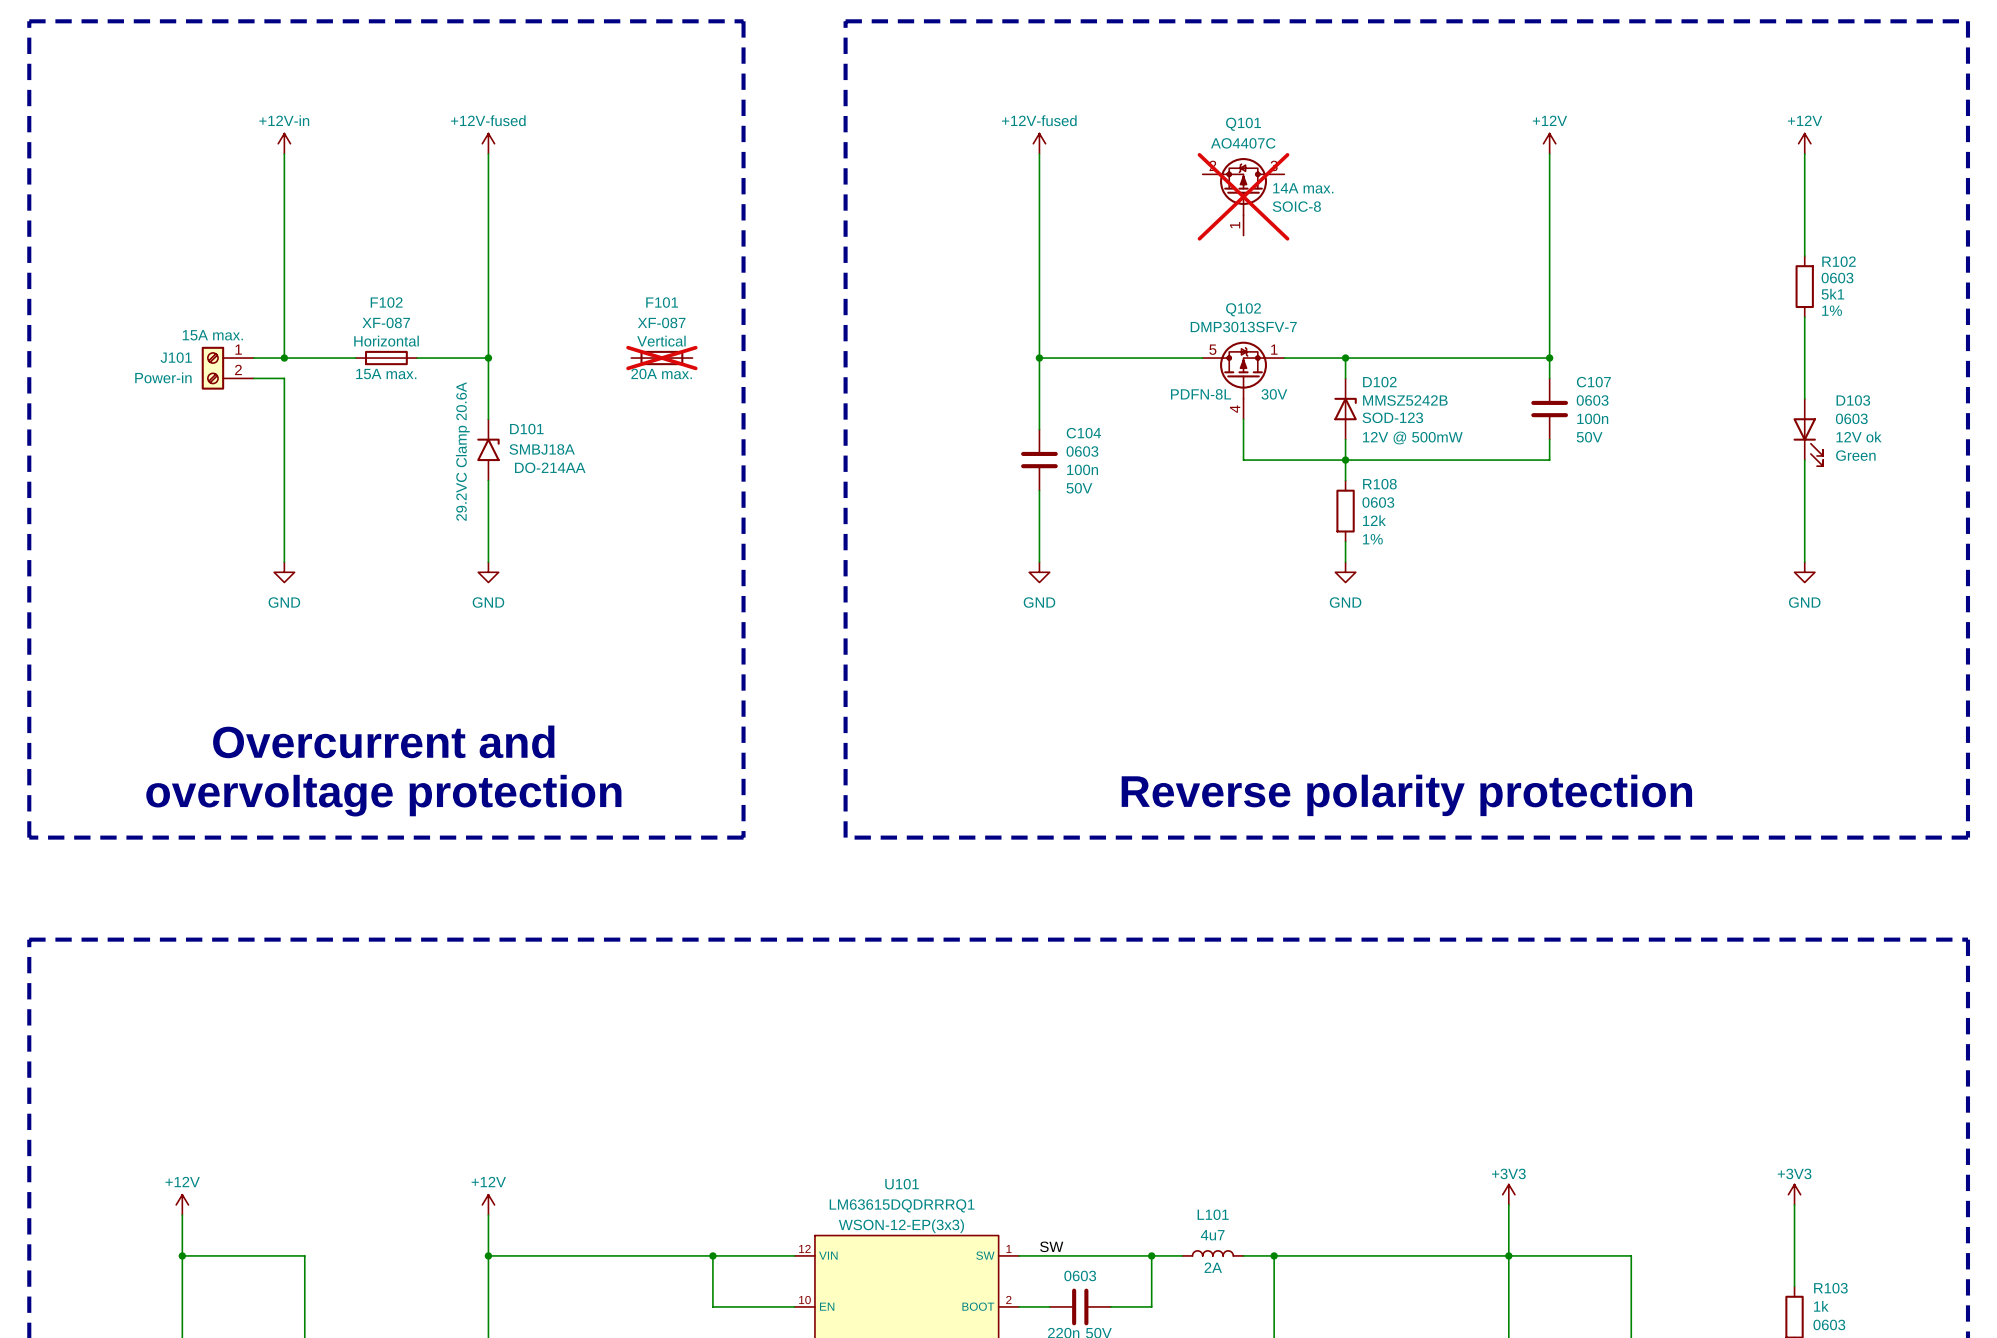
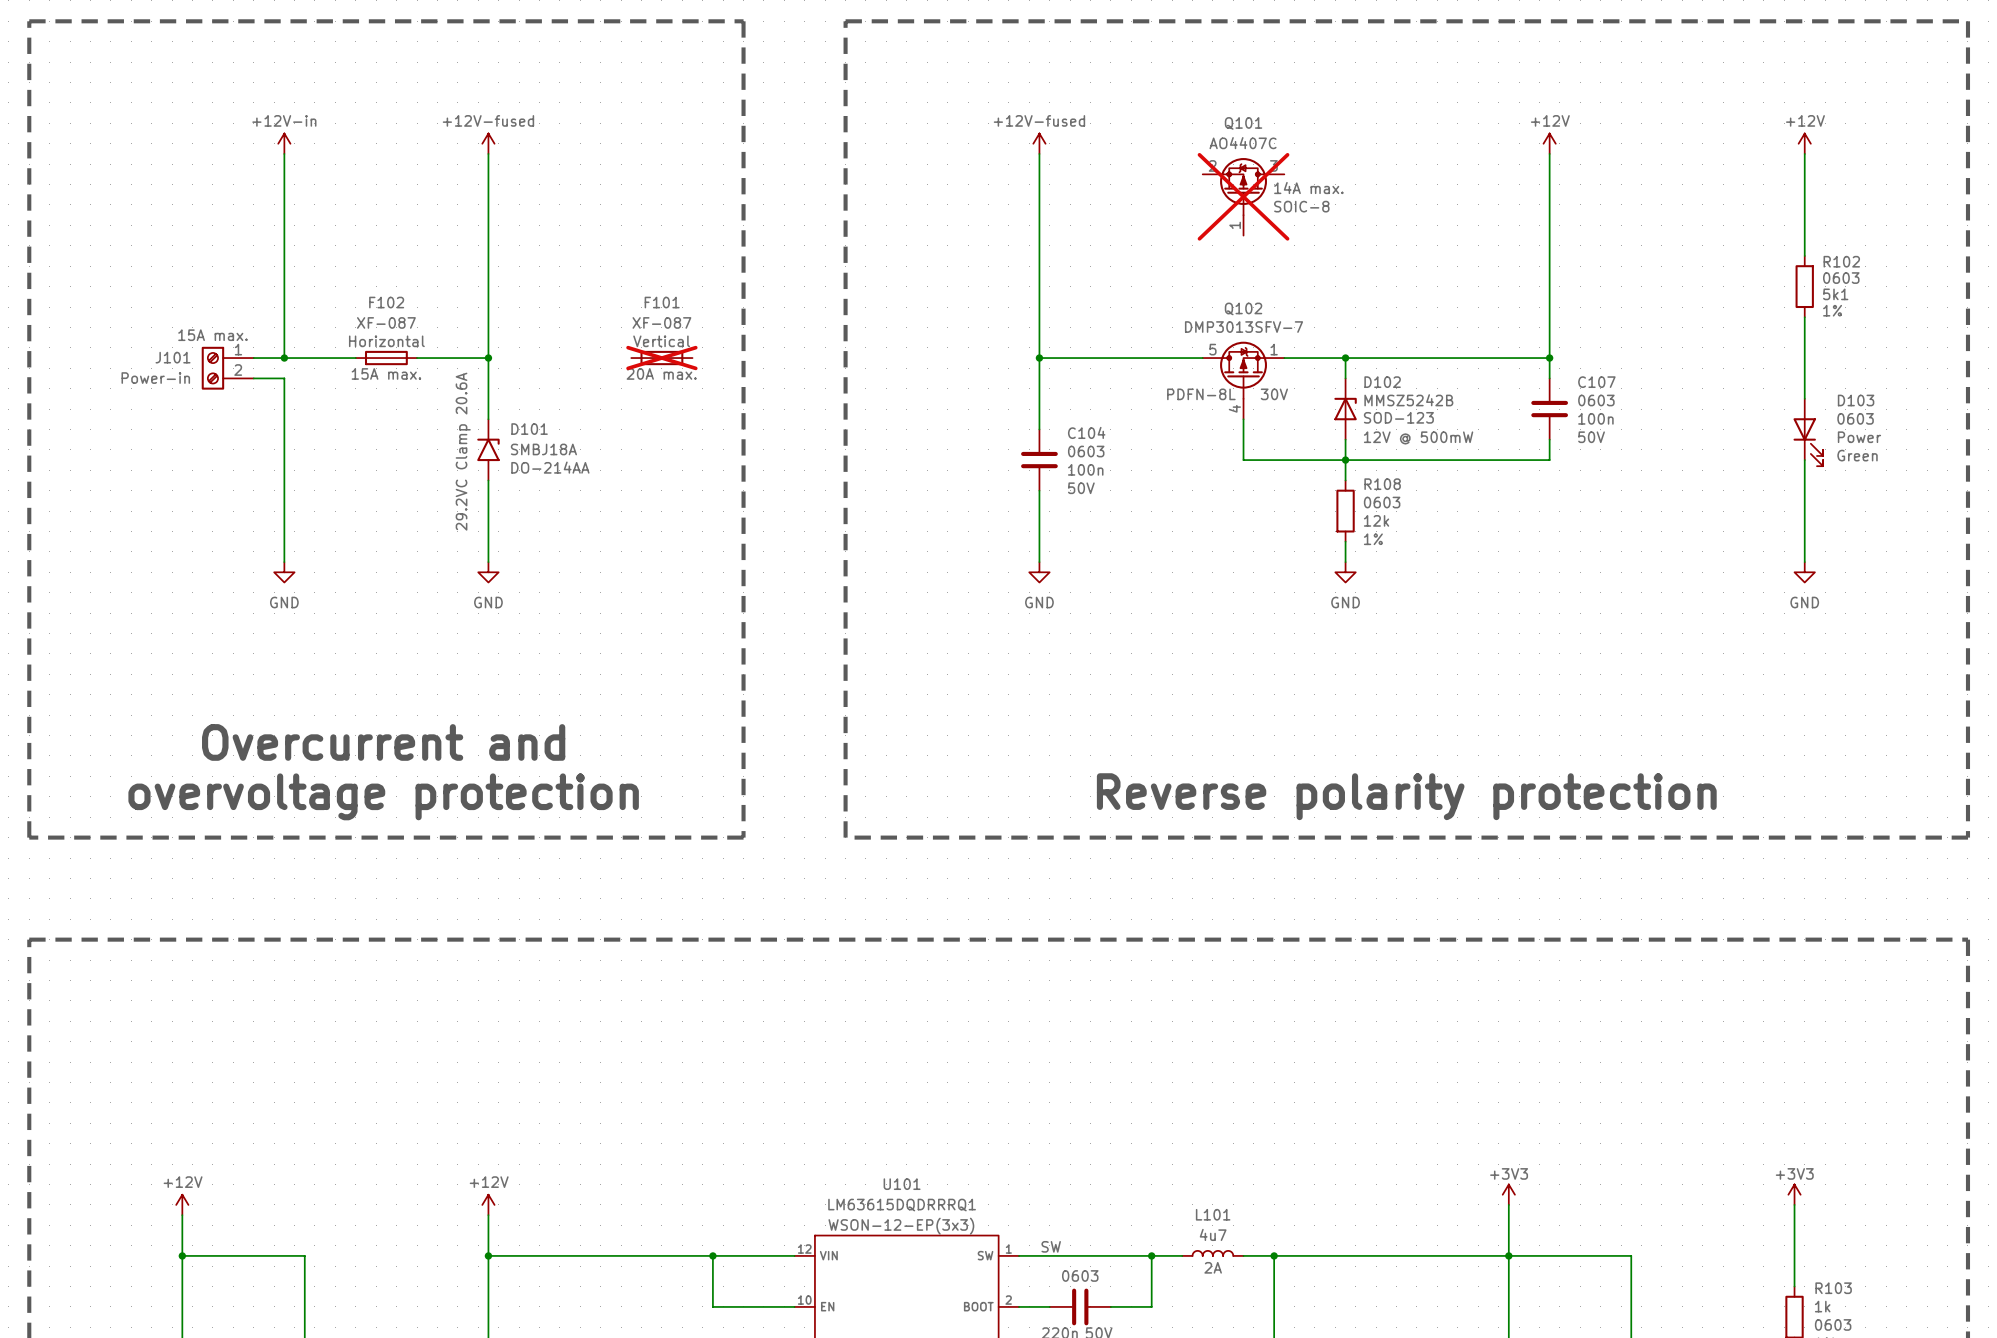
D103 value: 12V ok (1859, 437) -> Power (1859, 437)

